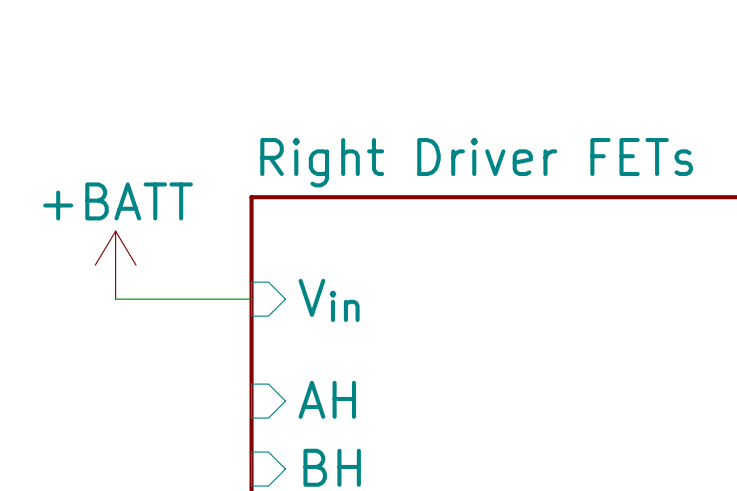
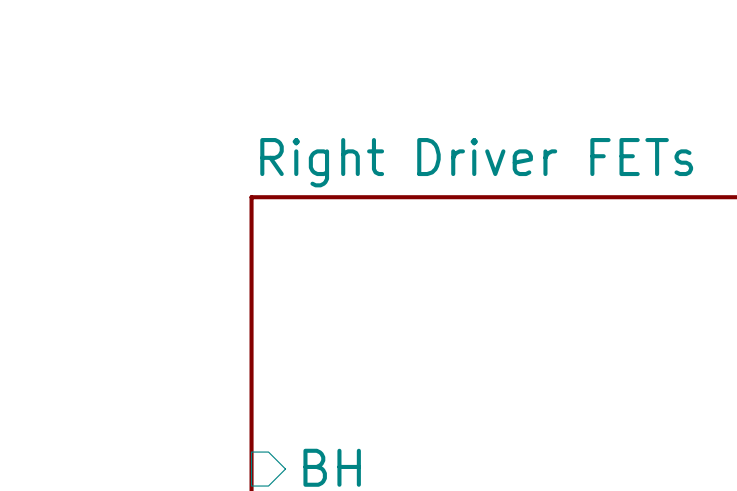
power symbol: +BATT (115, 265) -> none
wire: (115, 299) (251, 299) -> none
sheet pin: Vin (329, 300) -> none
sheet pin: AH (327, 399) -> none

